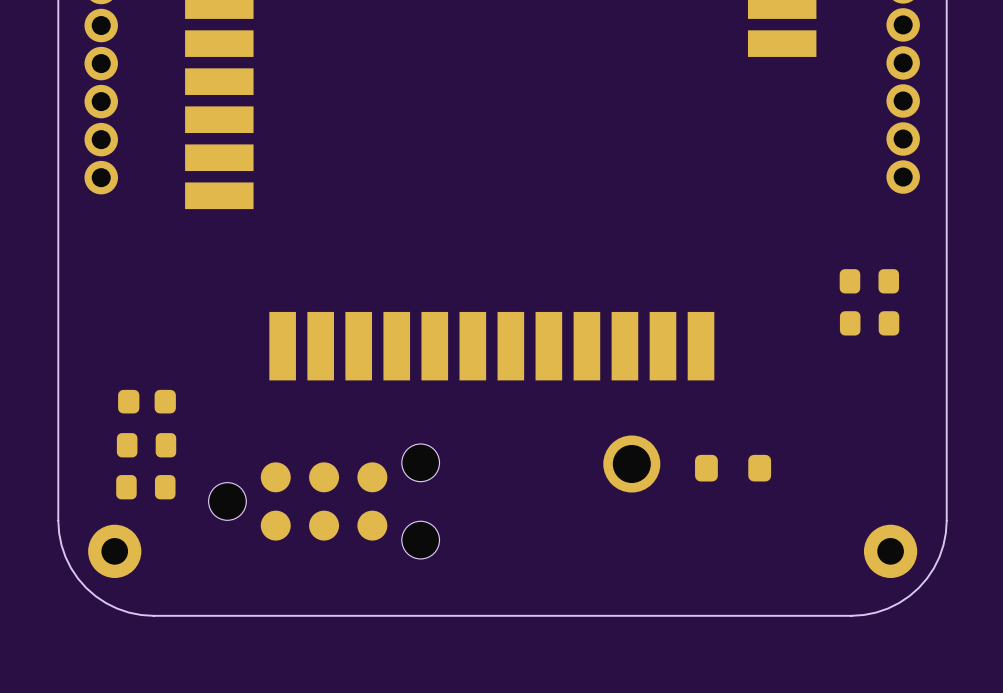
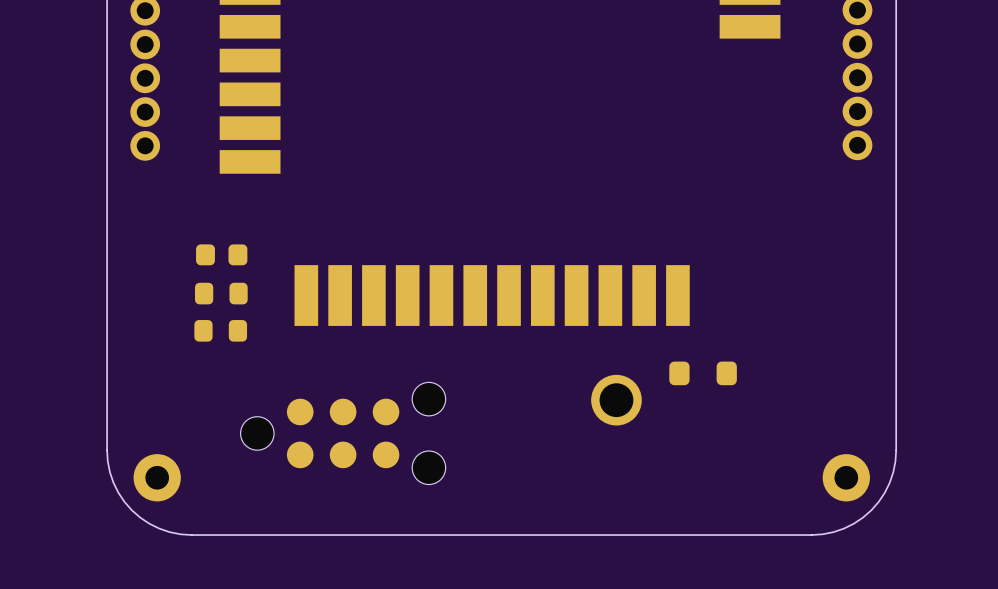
part: (869, 281) -> none
part: (869, 323) -> none
part: none -> (221, 293)
part: none -> (220, 330)
part position: (146, 401) -> (221, 254)
part: (146, 445) -> none
part position: (733, 468) -> (703, 373)
part: (145, 487) -> none

